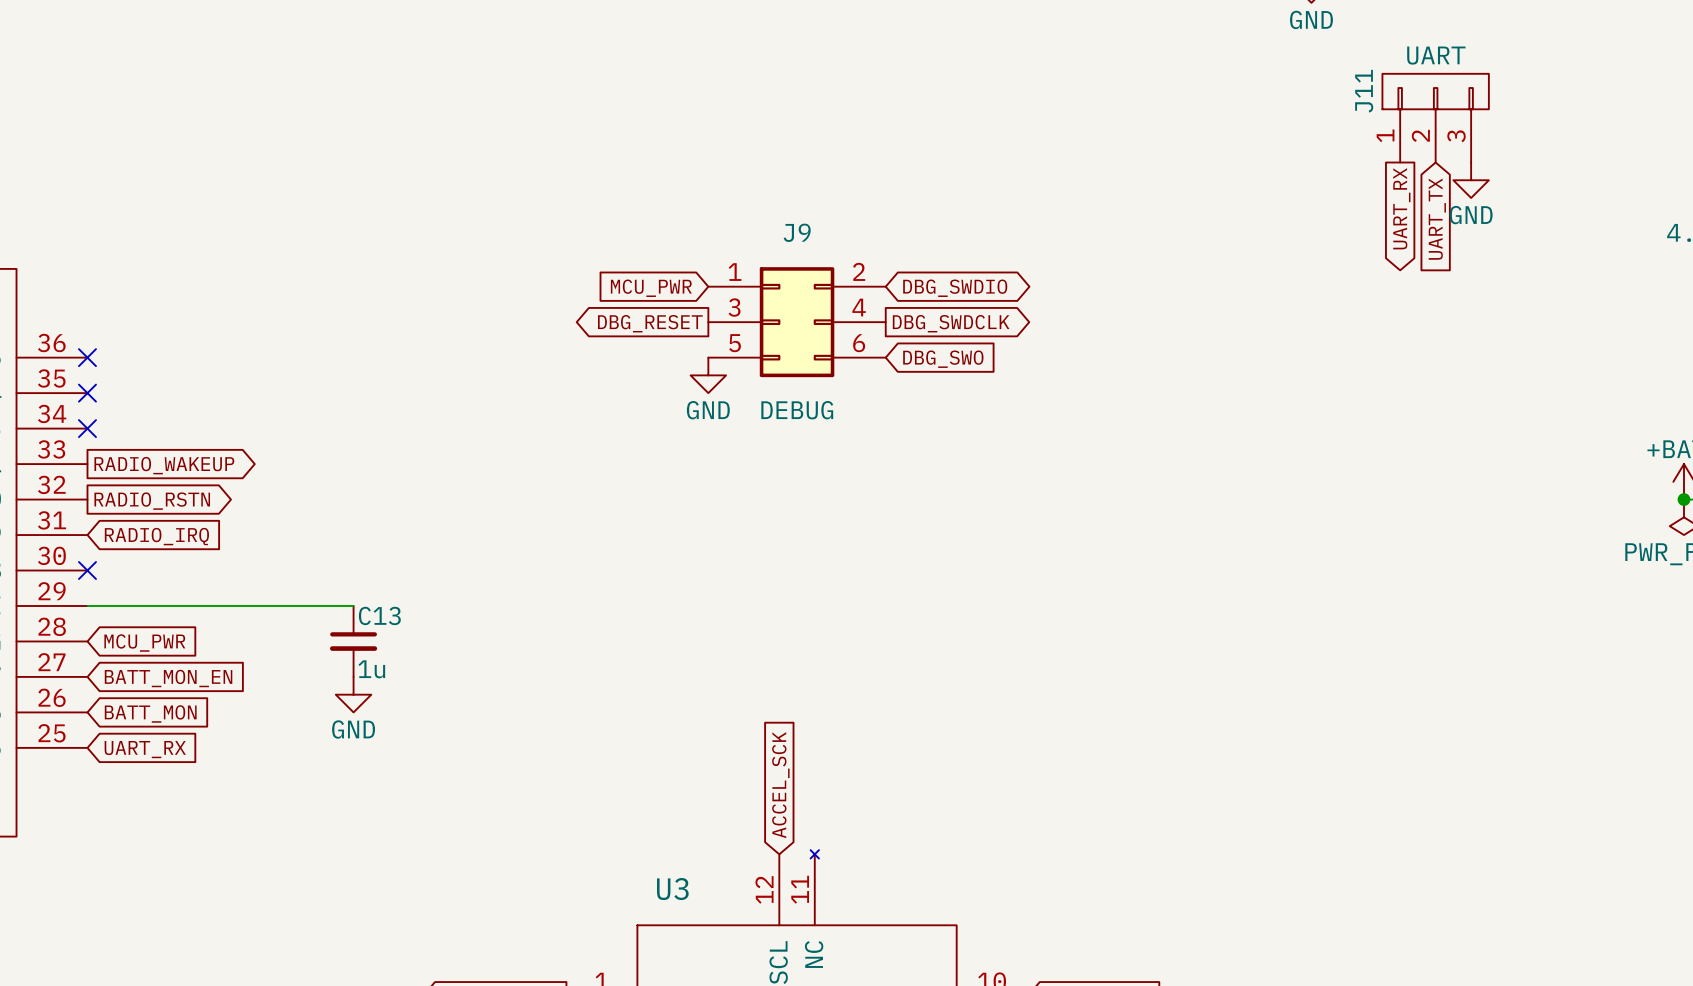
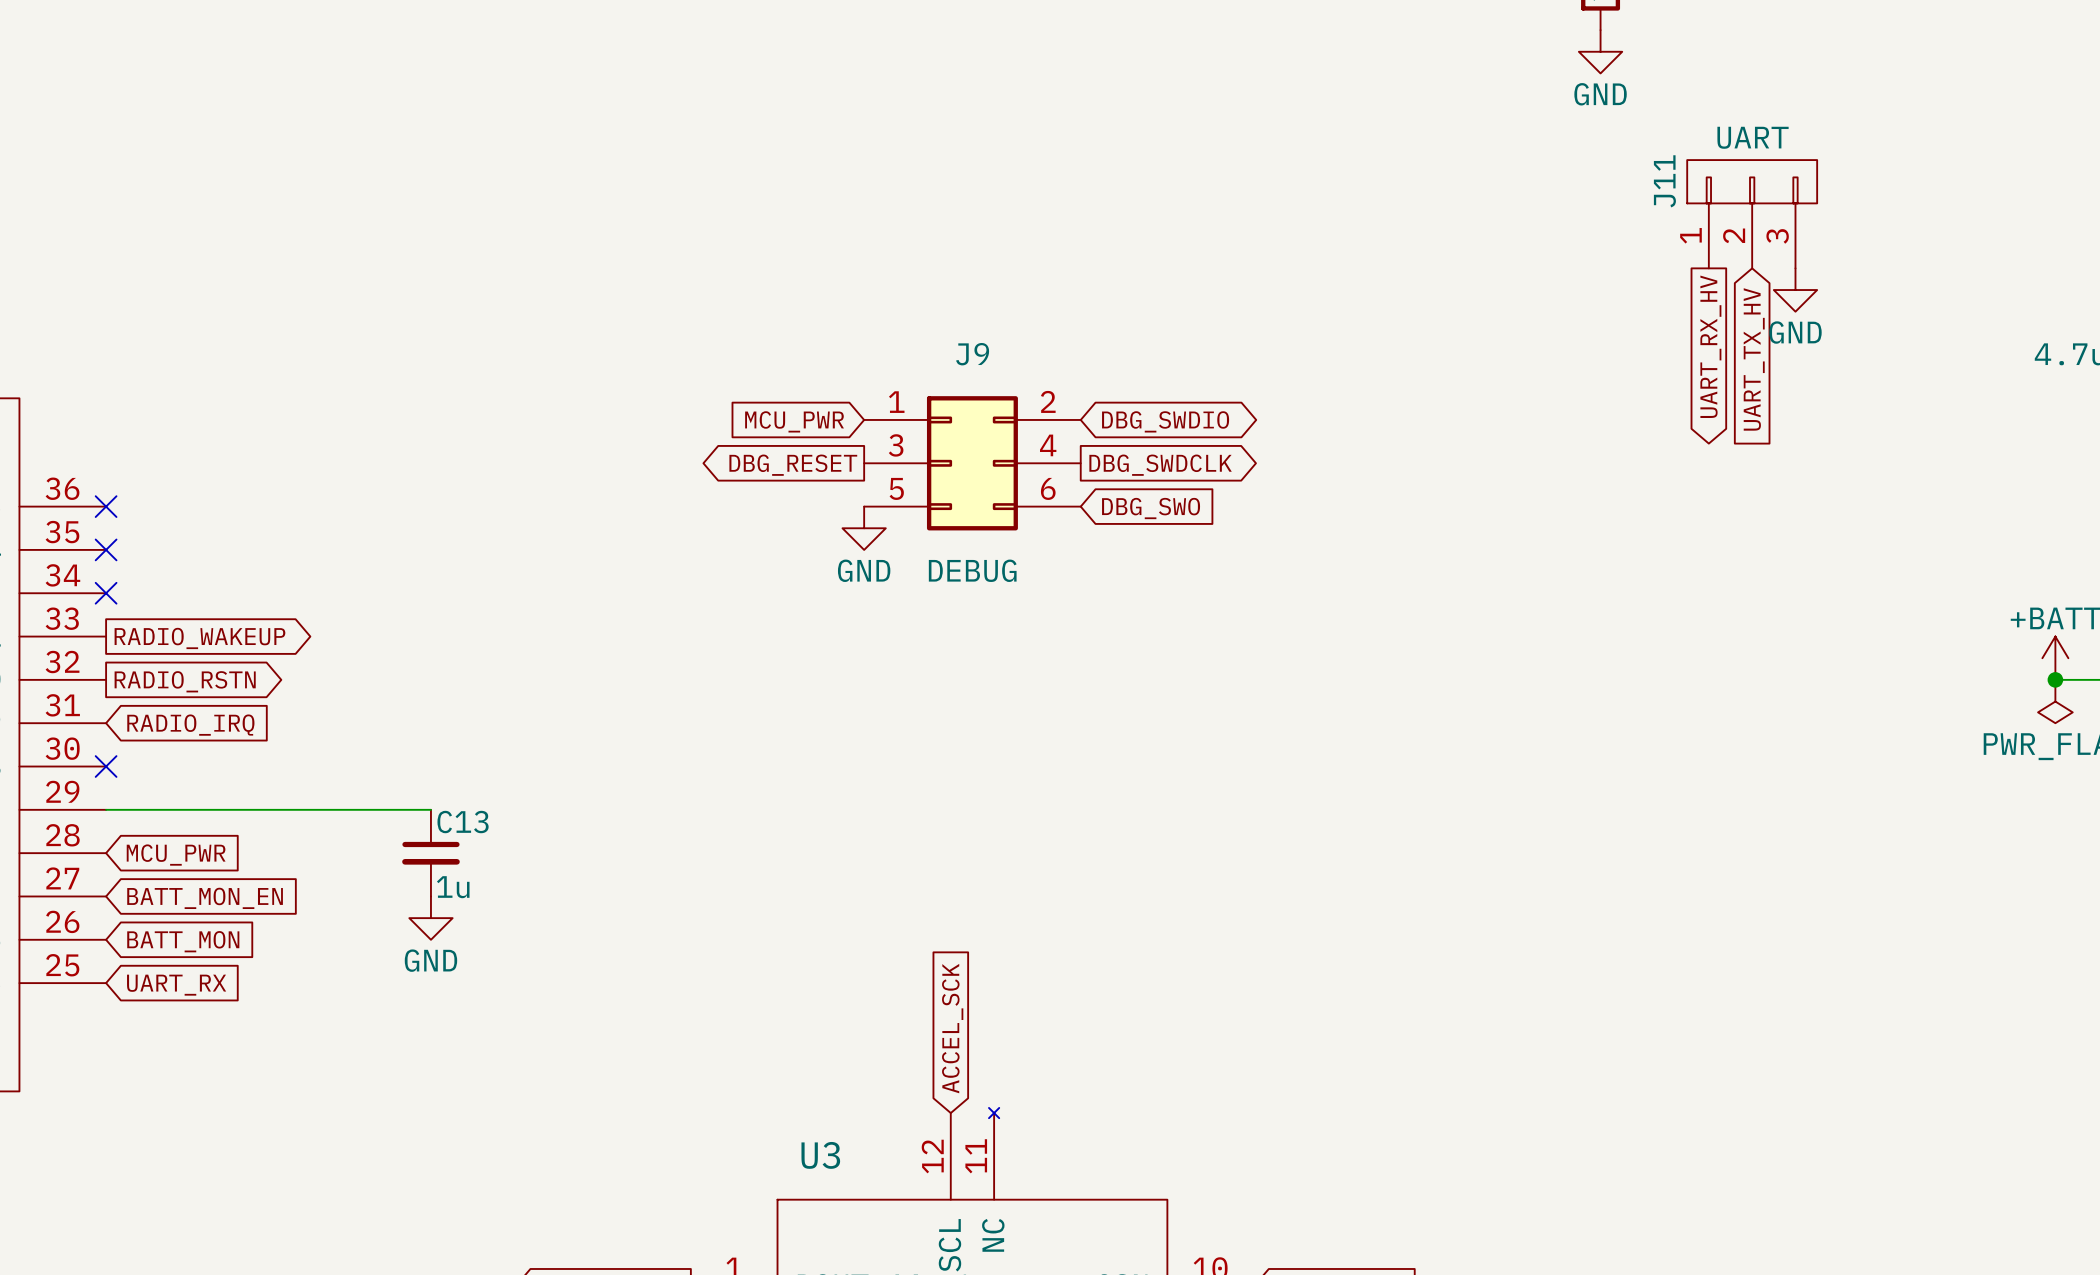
global label: UART_RX (1401, 208) -> UART_RX_HV (1710, 346)
global label: UART_TX (1437, 219) -> UART_TX_HV (1754, 359)

